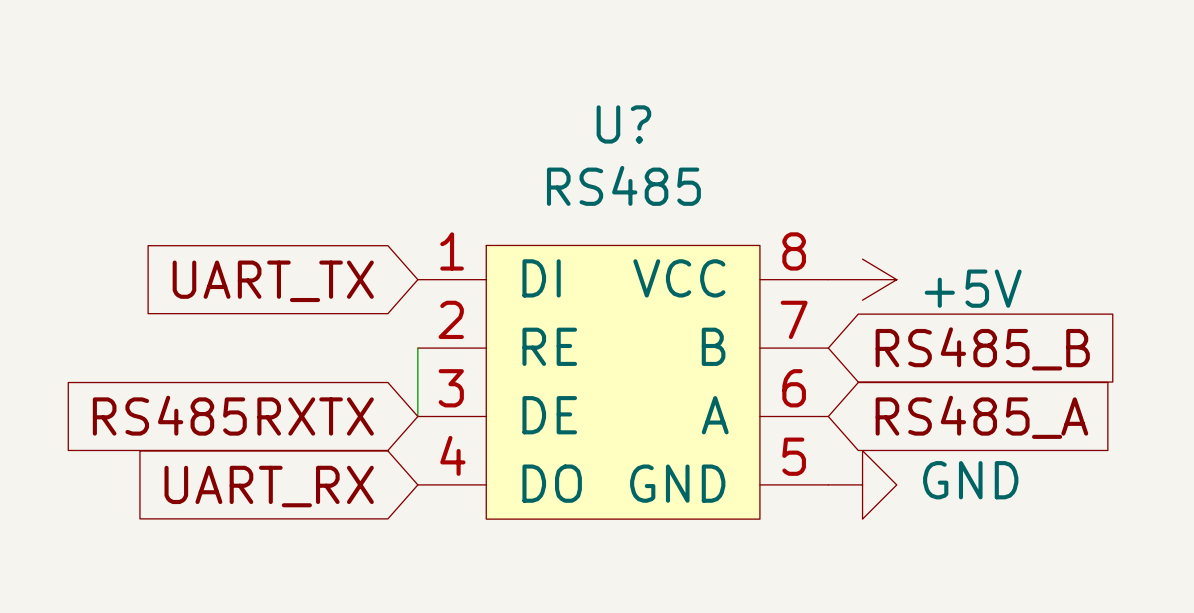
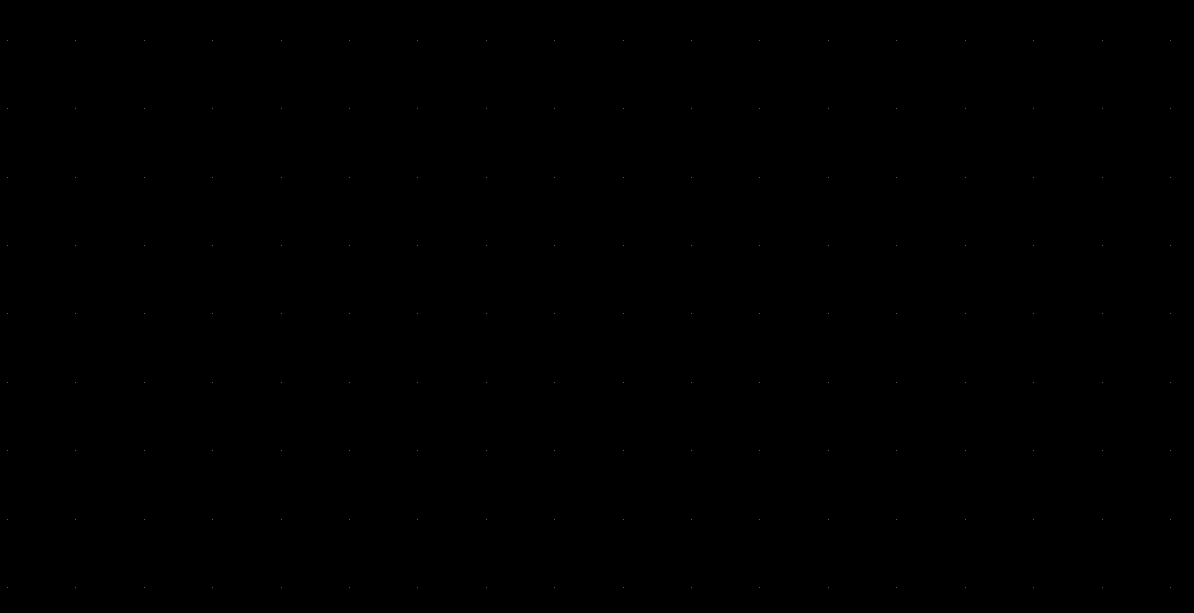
power symbol: +5V (862, 279) -> none
global label: UART_TX (273, 281) -> none
wire: (417, 348) (417, 416) -> none
global label: RS485_B (982, 348) -> none
U?: RS485 (623, 382) -> none
global label: RS485RXTX (233, 415) -> none
global label: RS485_A (981, 417) -> none
power symbol: GND (862, 484) -> none
global label: UART_RX (269, 486) -> none

